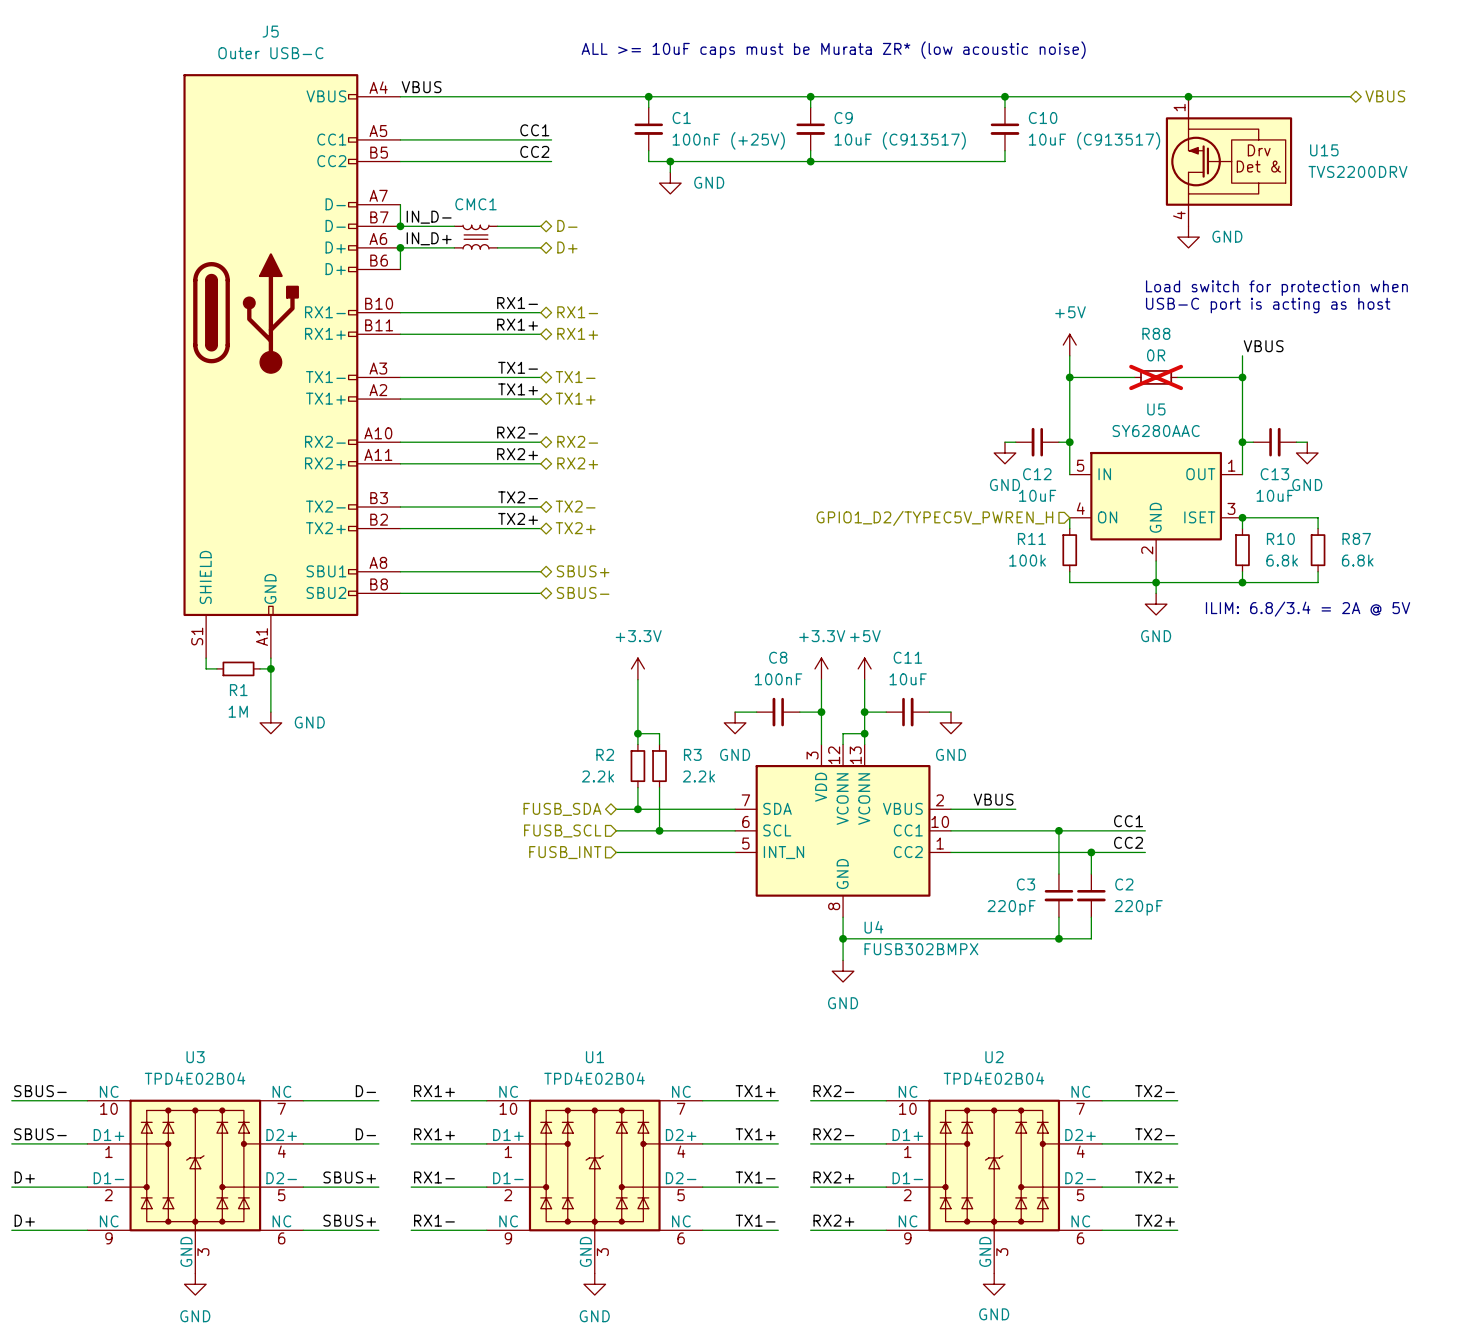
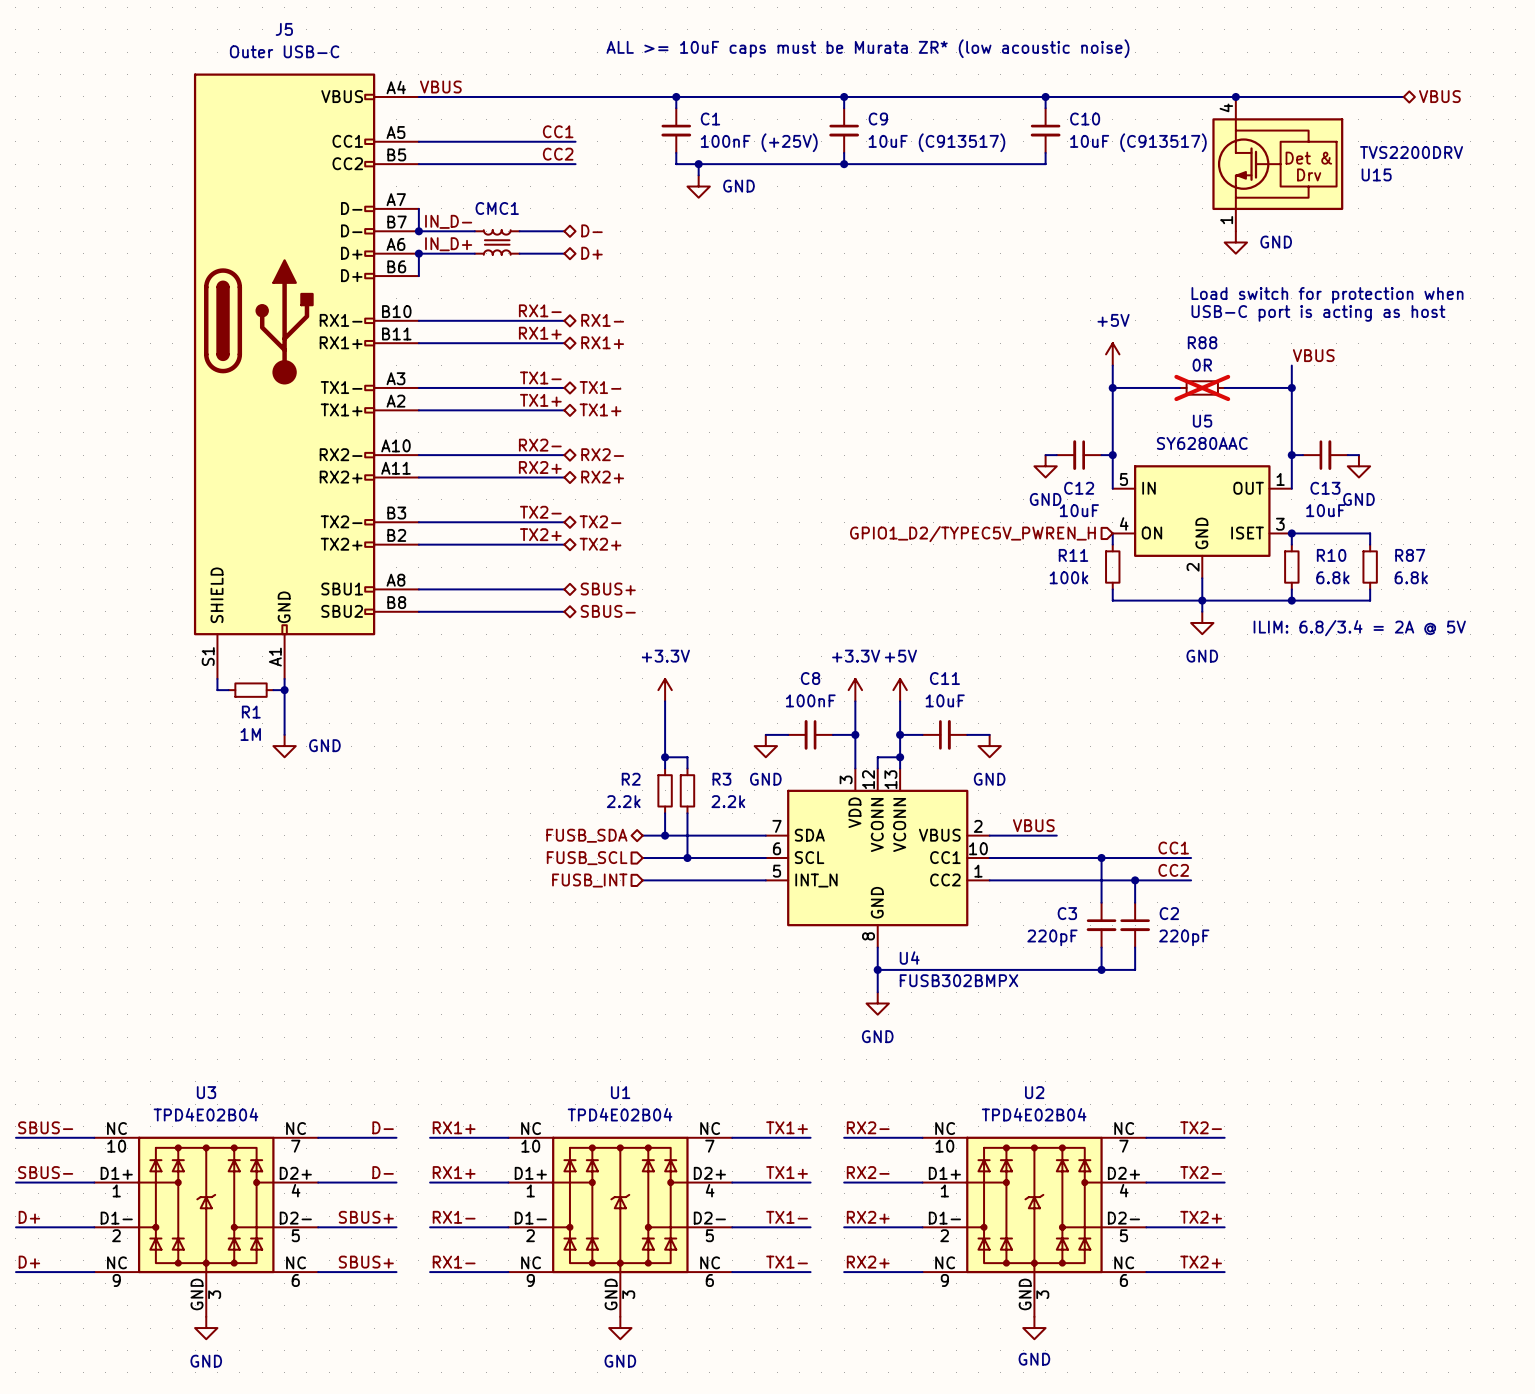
U15 flip: as is (1228, 161) -> up-down (1277, 164)

